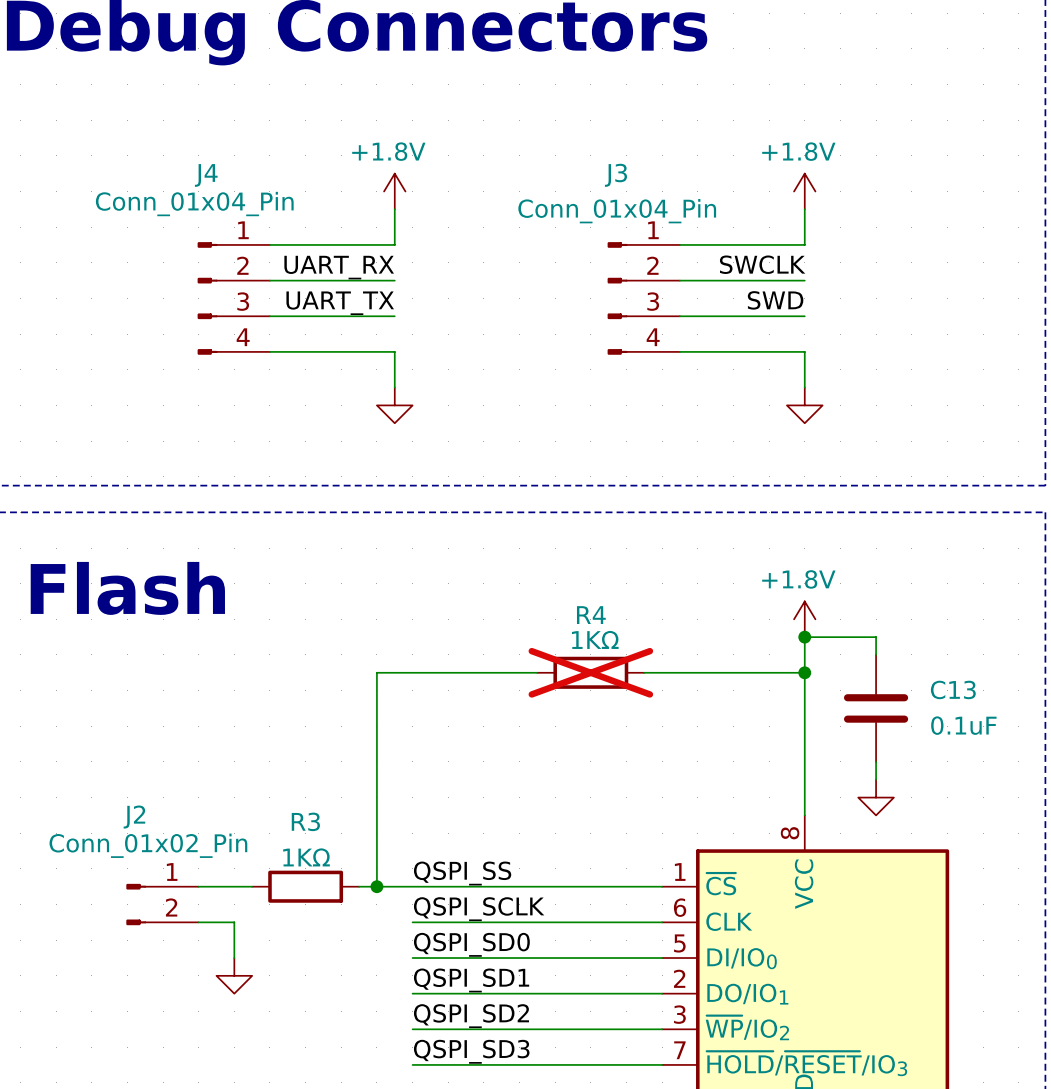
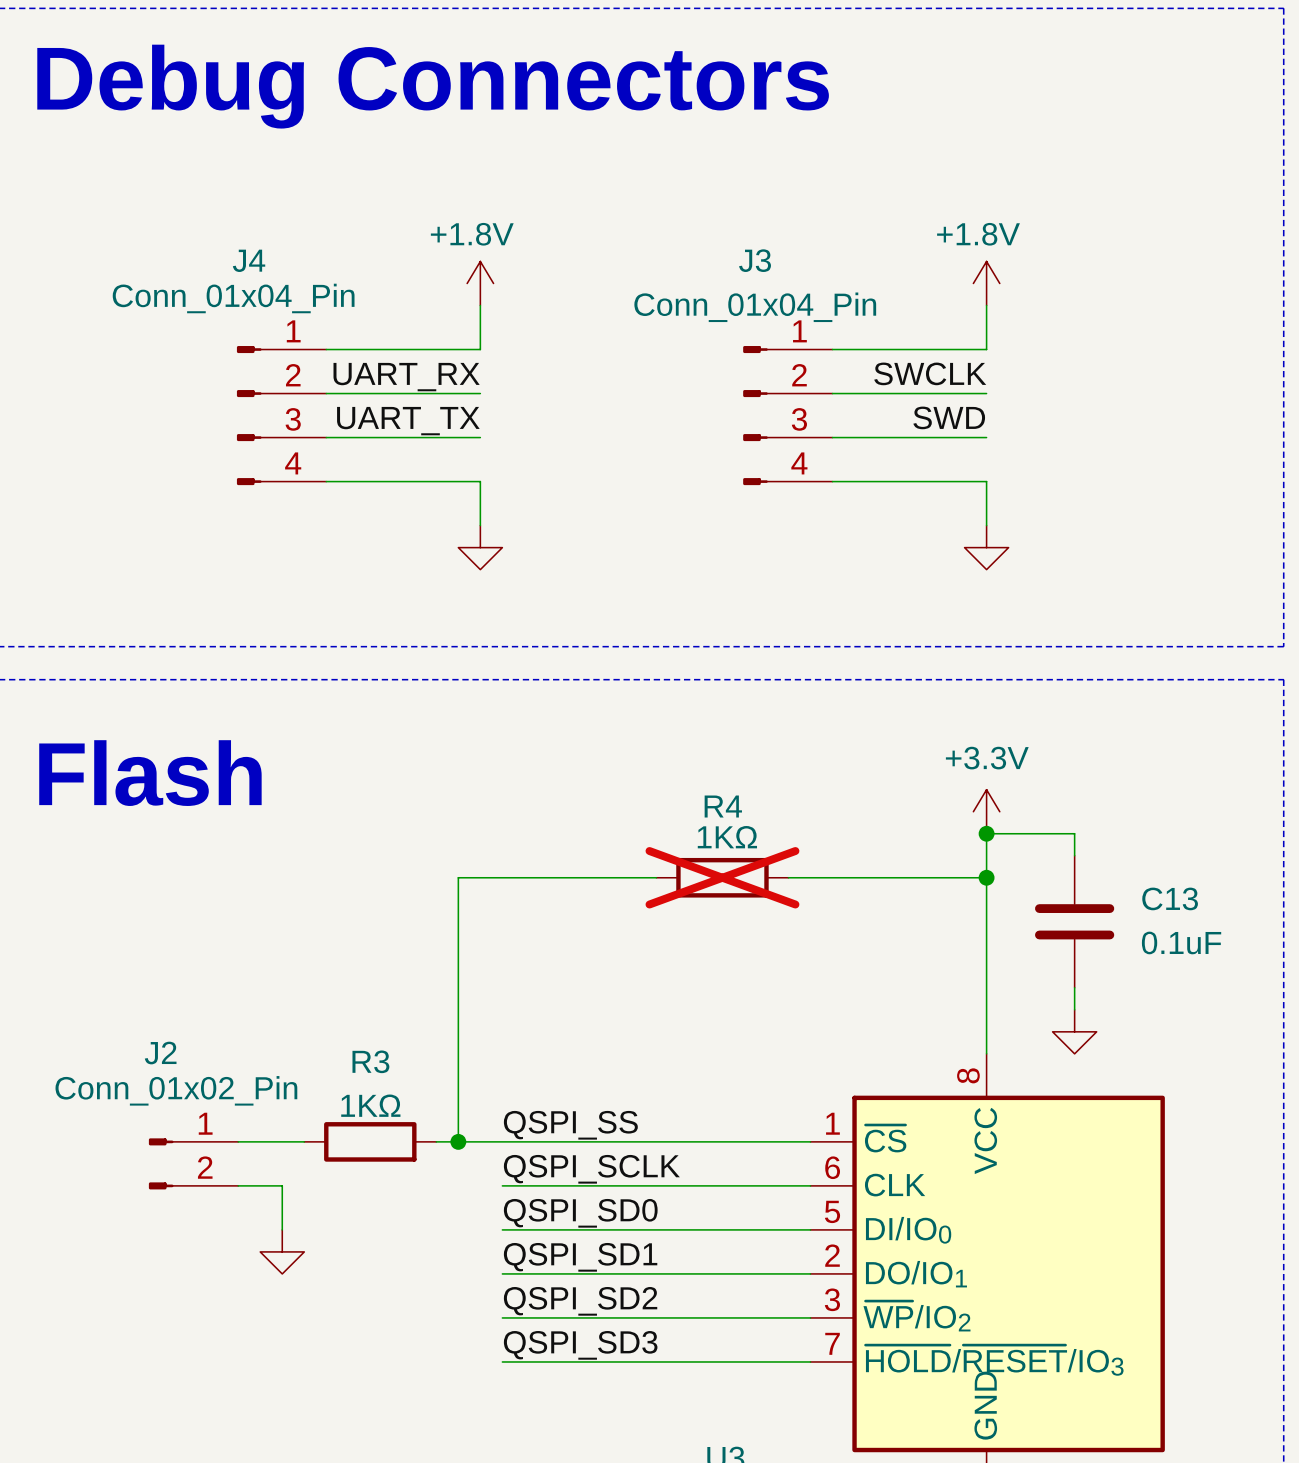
power symbol: +1.8V (804, 619) -> +3.3V (986, 811)

